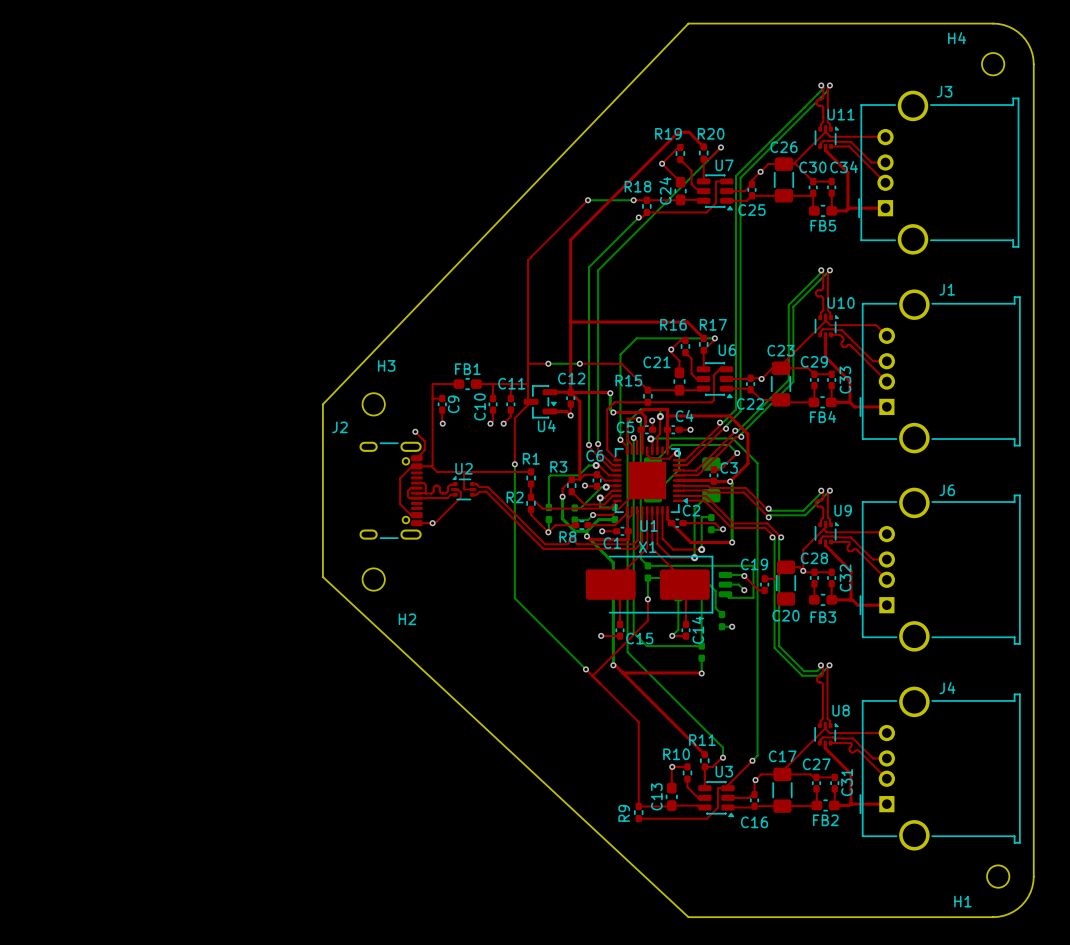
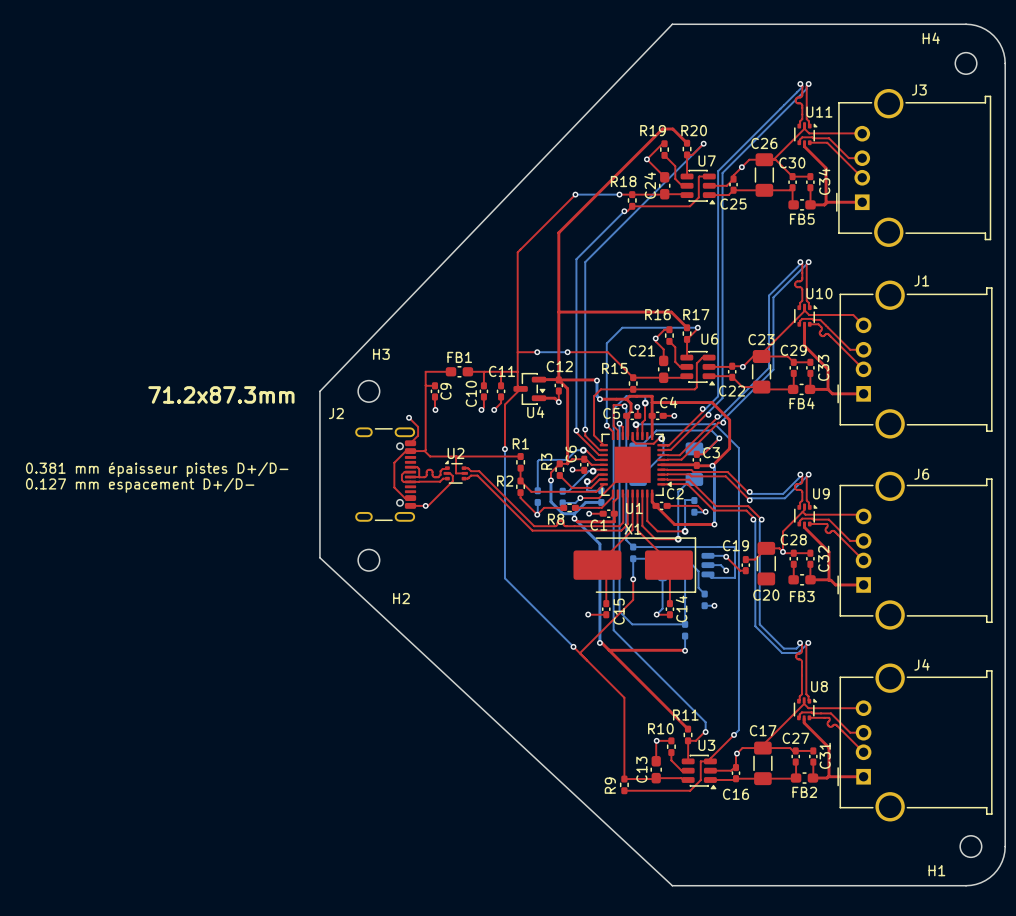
C34 name rotation: 0° (844, 167) -> 90° counterclockwise (824, 181)
text: none -> 71.2x87.3mm (221, 394)
C6 name rotation: 0° (595, 455) -> 90° counterclockwise (571, 454)
R3 name rotation: 0° (558, 466) -> 90° counterclockwise (546, 461)
text: none -> 0.381 mm épaisseur pistes D+/D- (157, 469)
text: none -> 0.127 mm espacement D+/D- (140, 485)
C15 name rotation: 0° (639, 638) -> 90° counterclockwise (619, 611)

